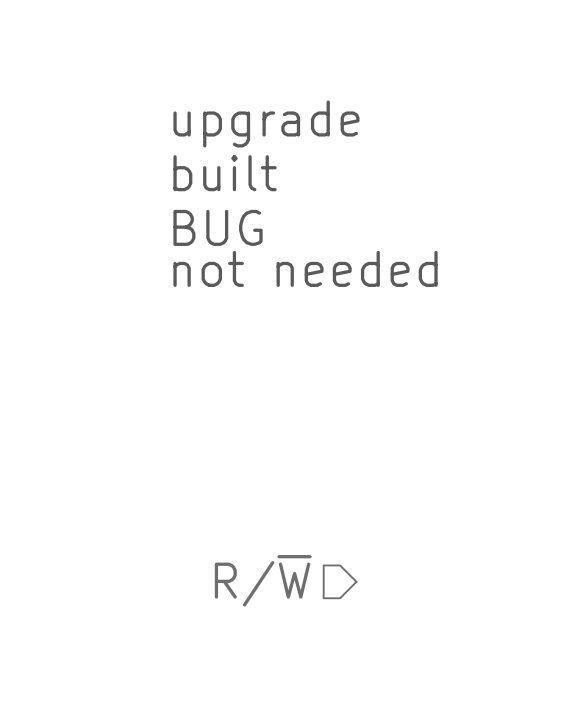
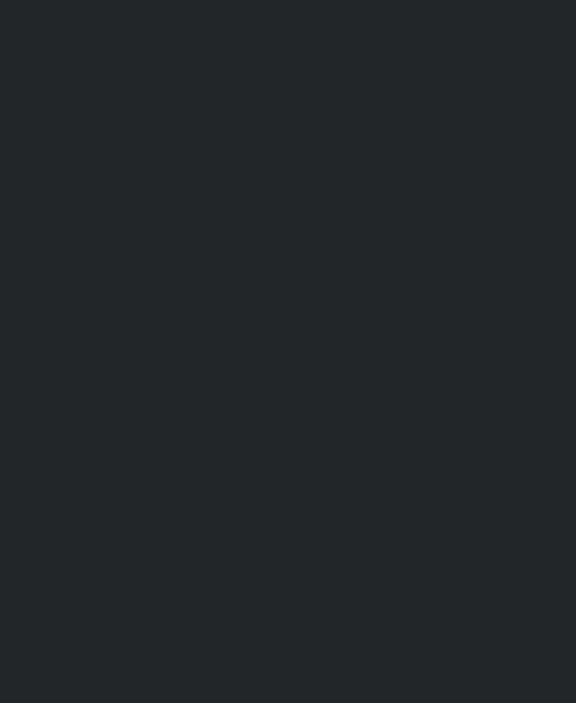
text: upgrade (266, 123) -> none
text: built (225, 173) -> none
text: BUG (218, 227) -> none
text: not needed (305, 268) -> none
hierarchical label: R/~{W} (263, 580) -> none

